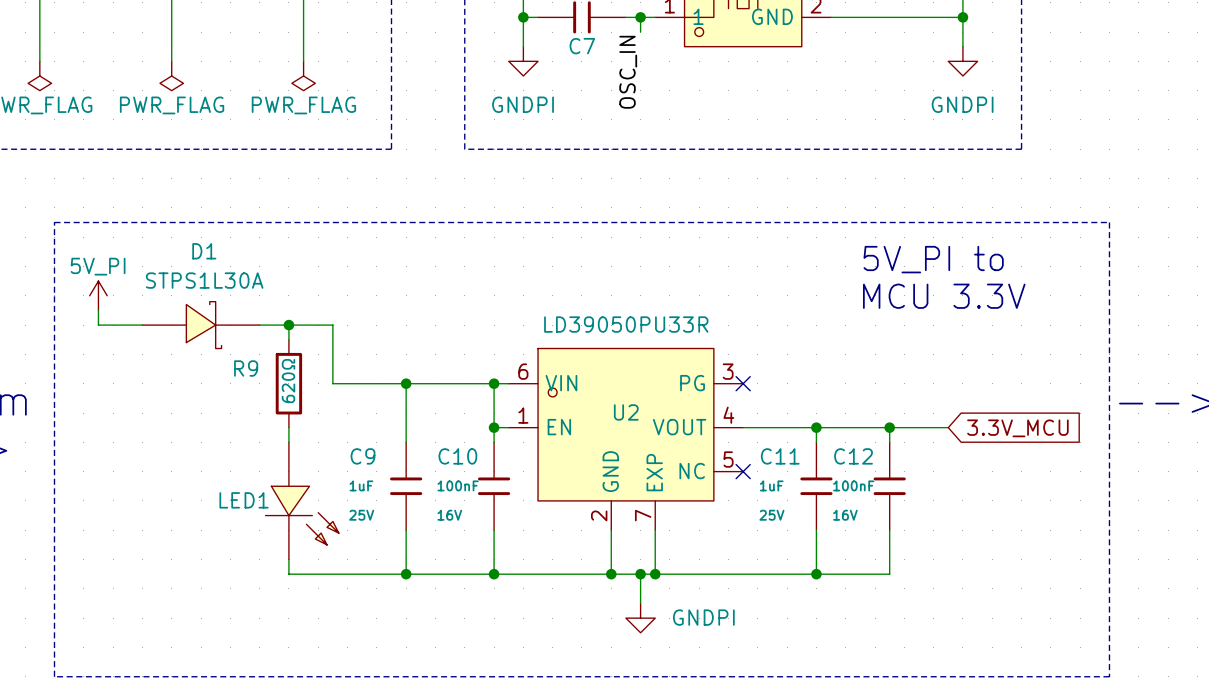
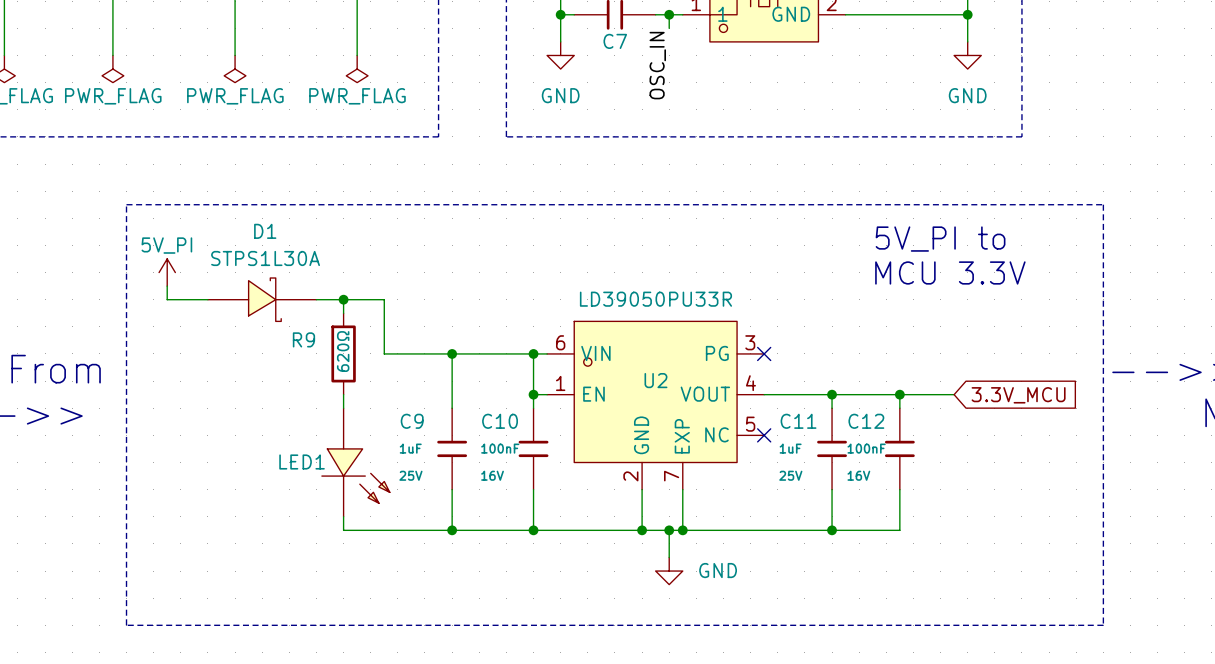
power symbol: GNDPI (523, 61) -> GND (560, 55)
power symbol: GNDPI (962, 61) -> GND (967, 55)
power symbol: GNDPI (640, 618) -> GND (669, 571)

